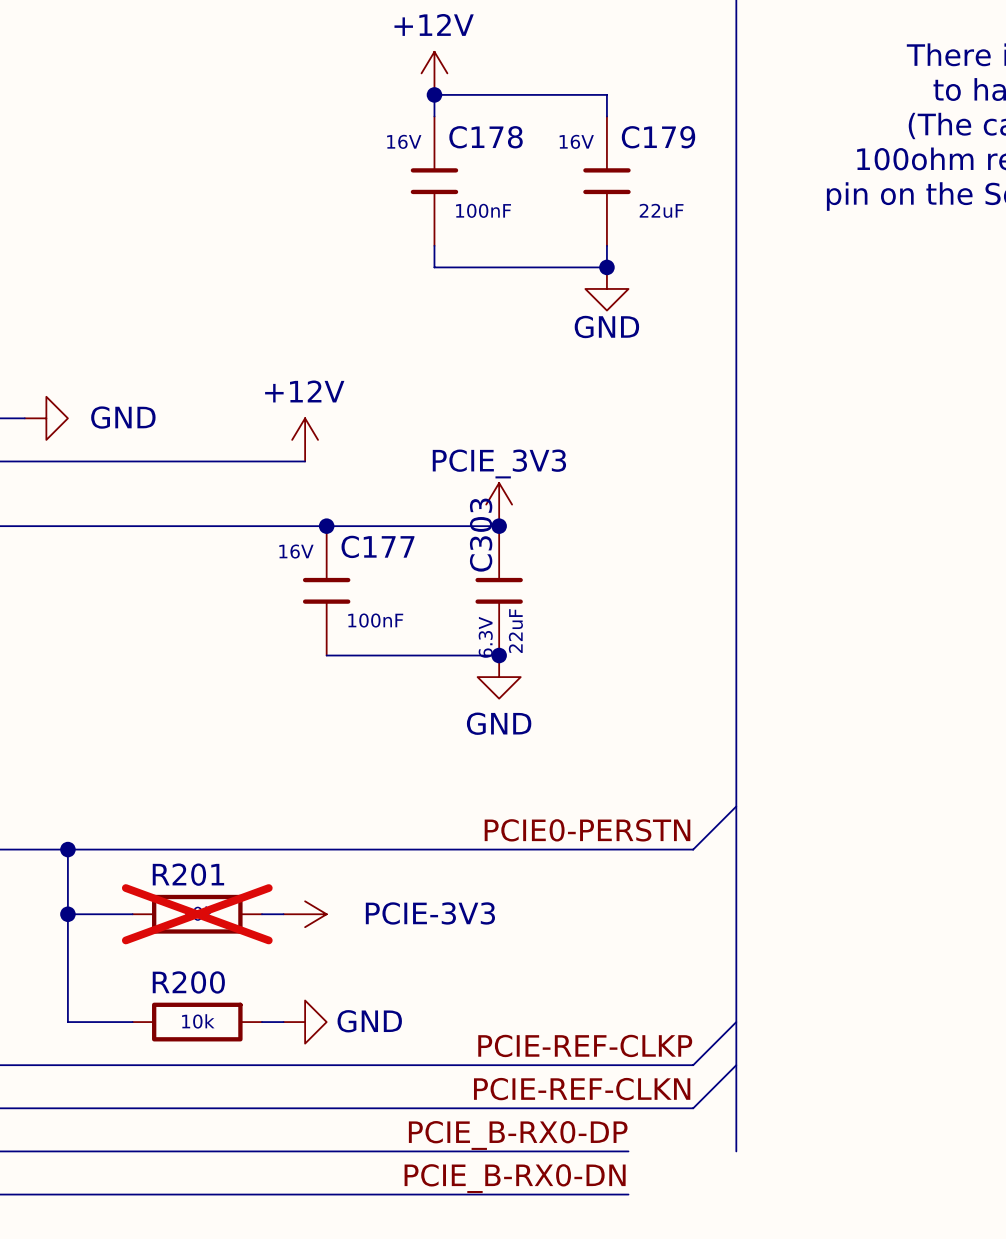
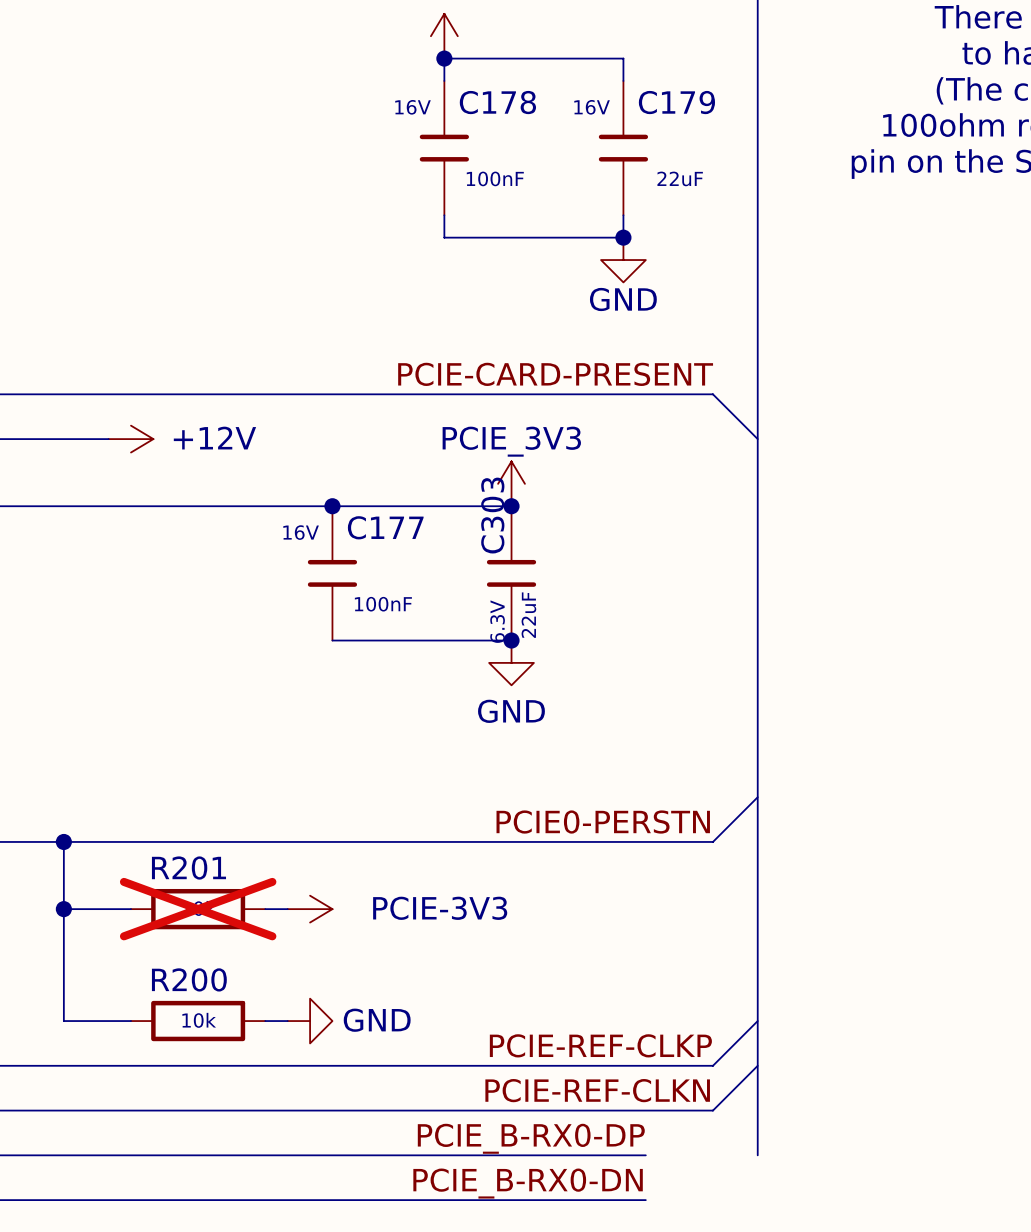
label: none -> PCIE-CARD-PRESENT (555, 374)
wire: none -> (19, 394) (712, 394) (757, 439)
power symbol: GND (46, 418) -> none
power symbol rotation: 0° (305, 439) -> 90° clockwise (131, 439)
power symbol position: +12V (305, 439) -> +12V (131, 439)
wire: (111, 461) (305, 461) -> none

